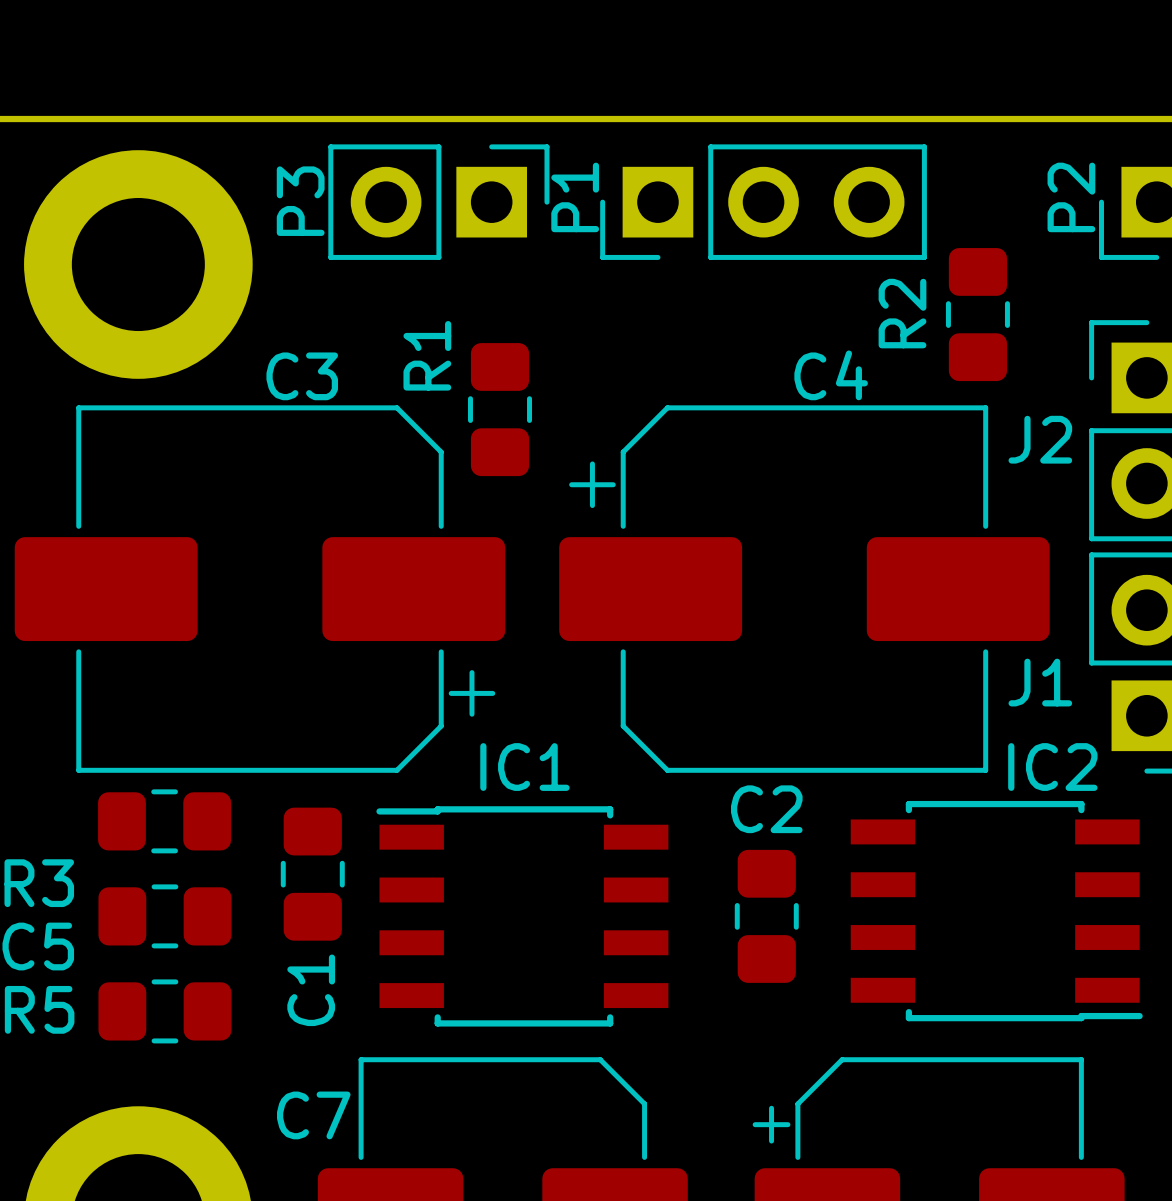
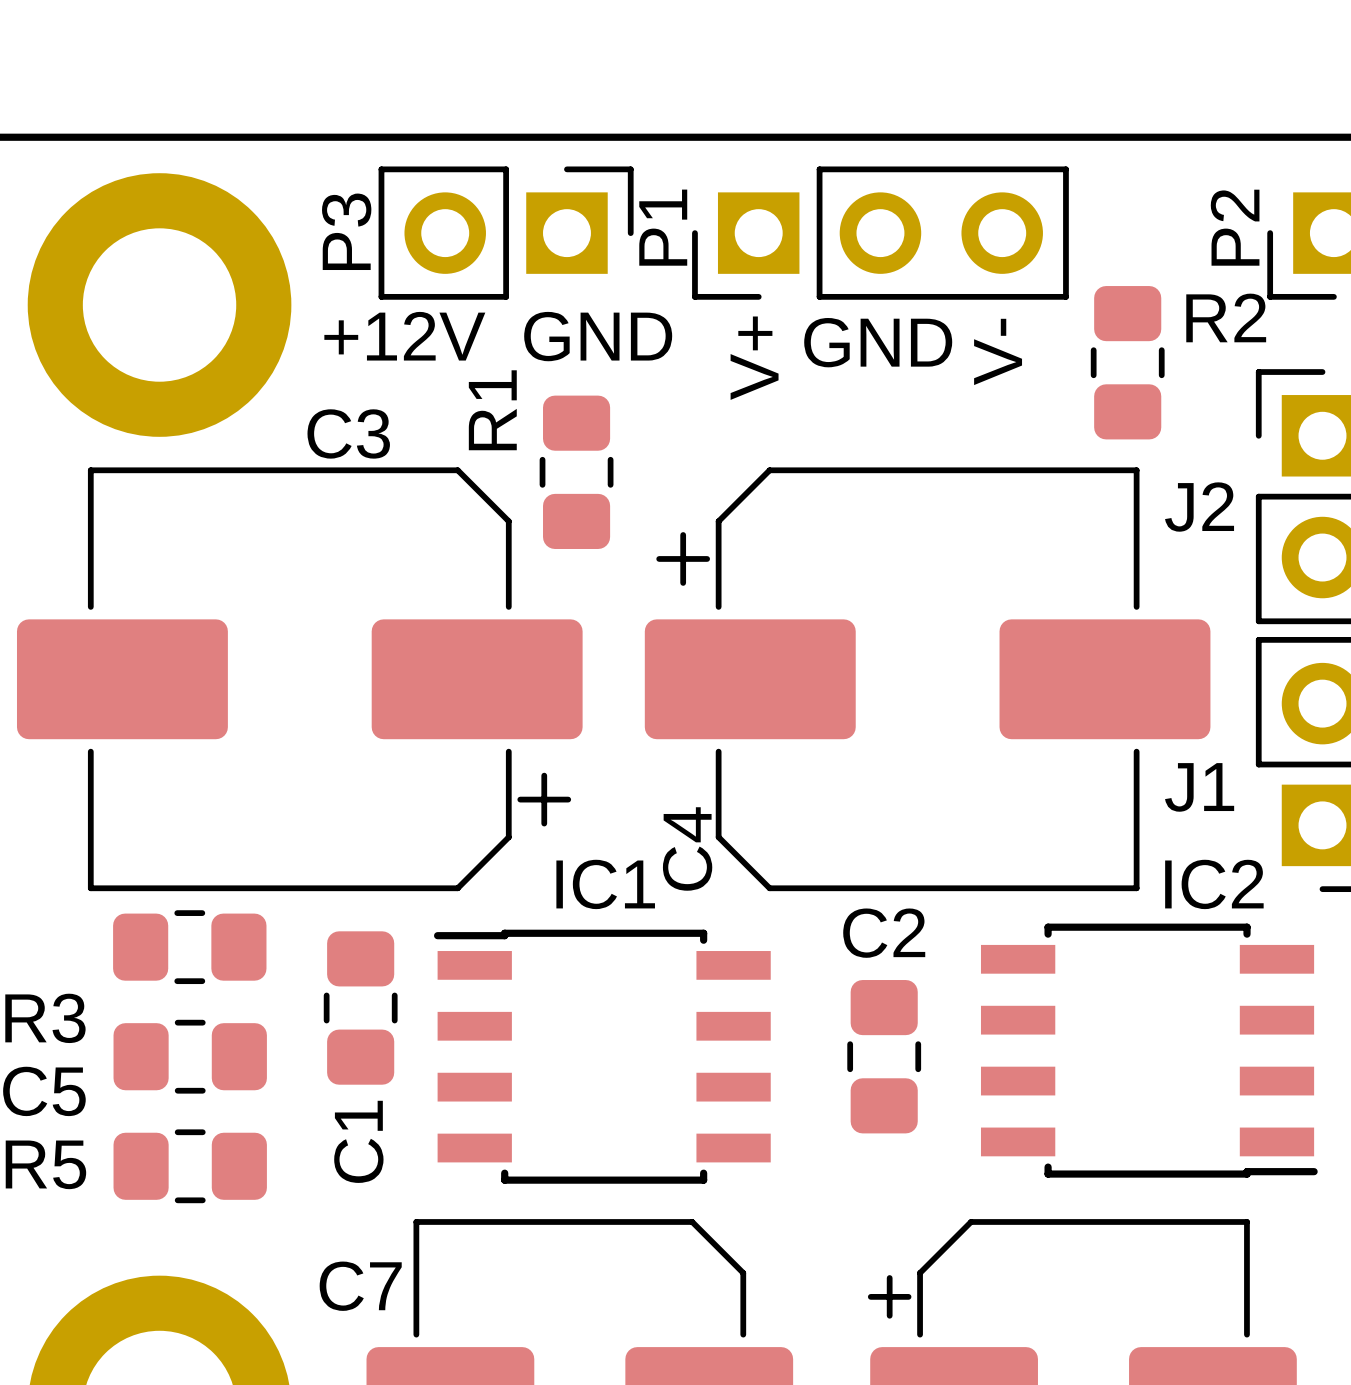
text: none -> +12V (404, 336)
text: none -> GND (598, 336)
text: none -> GND (878, 342)
text: none -> V- (998, 351)
text: none -> V+ (754, 358)
R2 name rotation: 0° (902, 313) -> 90° clockwise (1226, 317)
R2 name position: R2 (902, 313) -> R2 (1226, 317)
C4 name rotation: 0° (831, 375) -> 90° counterclockwise (687, 848)
C4 name position: C4 (831, 375) -> C4 (687, 848)

